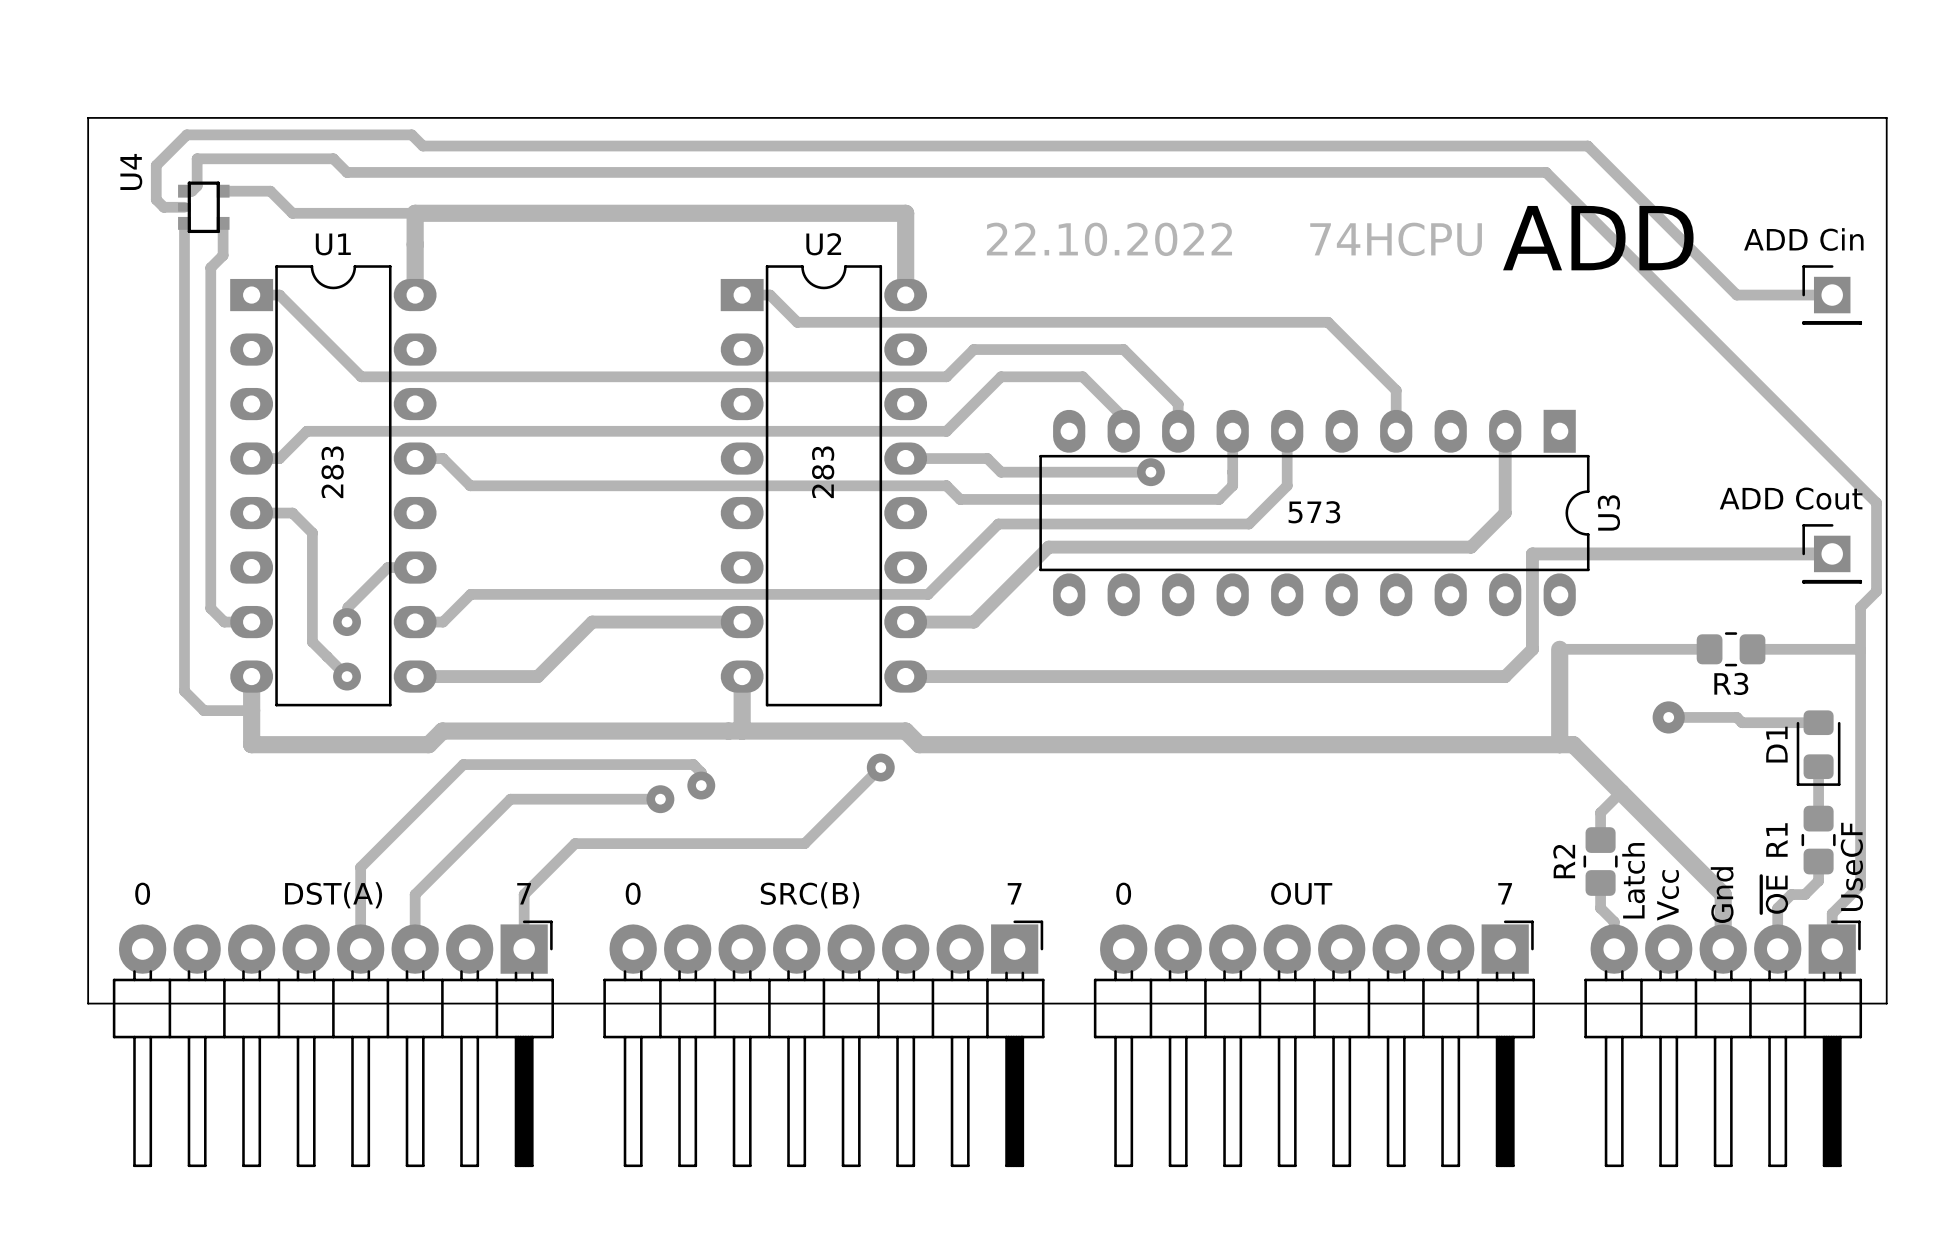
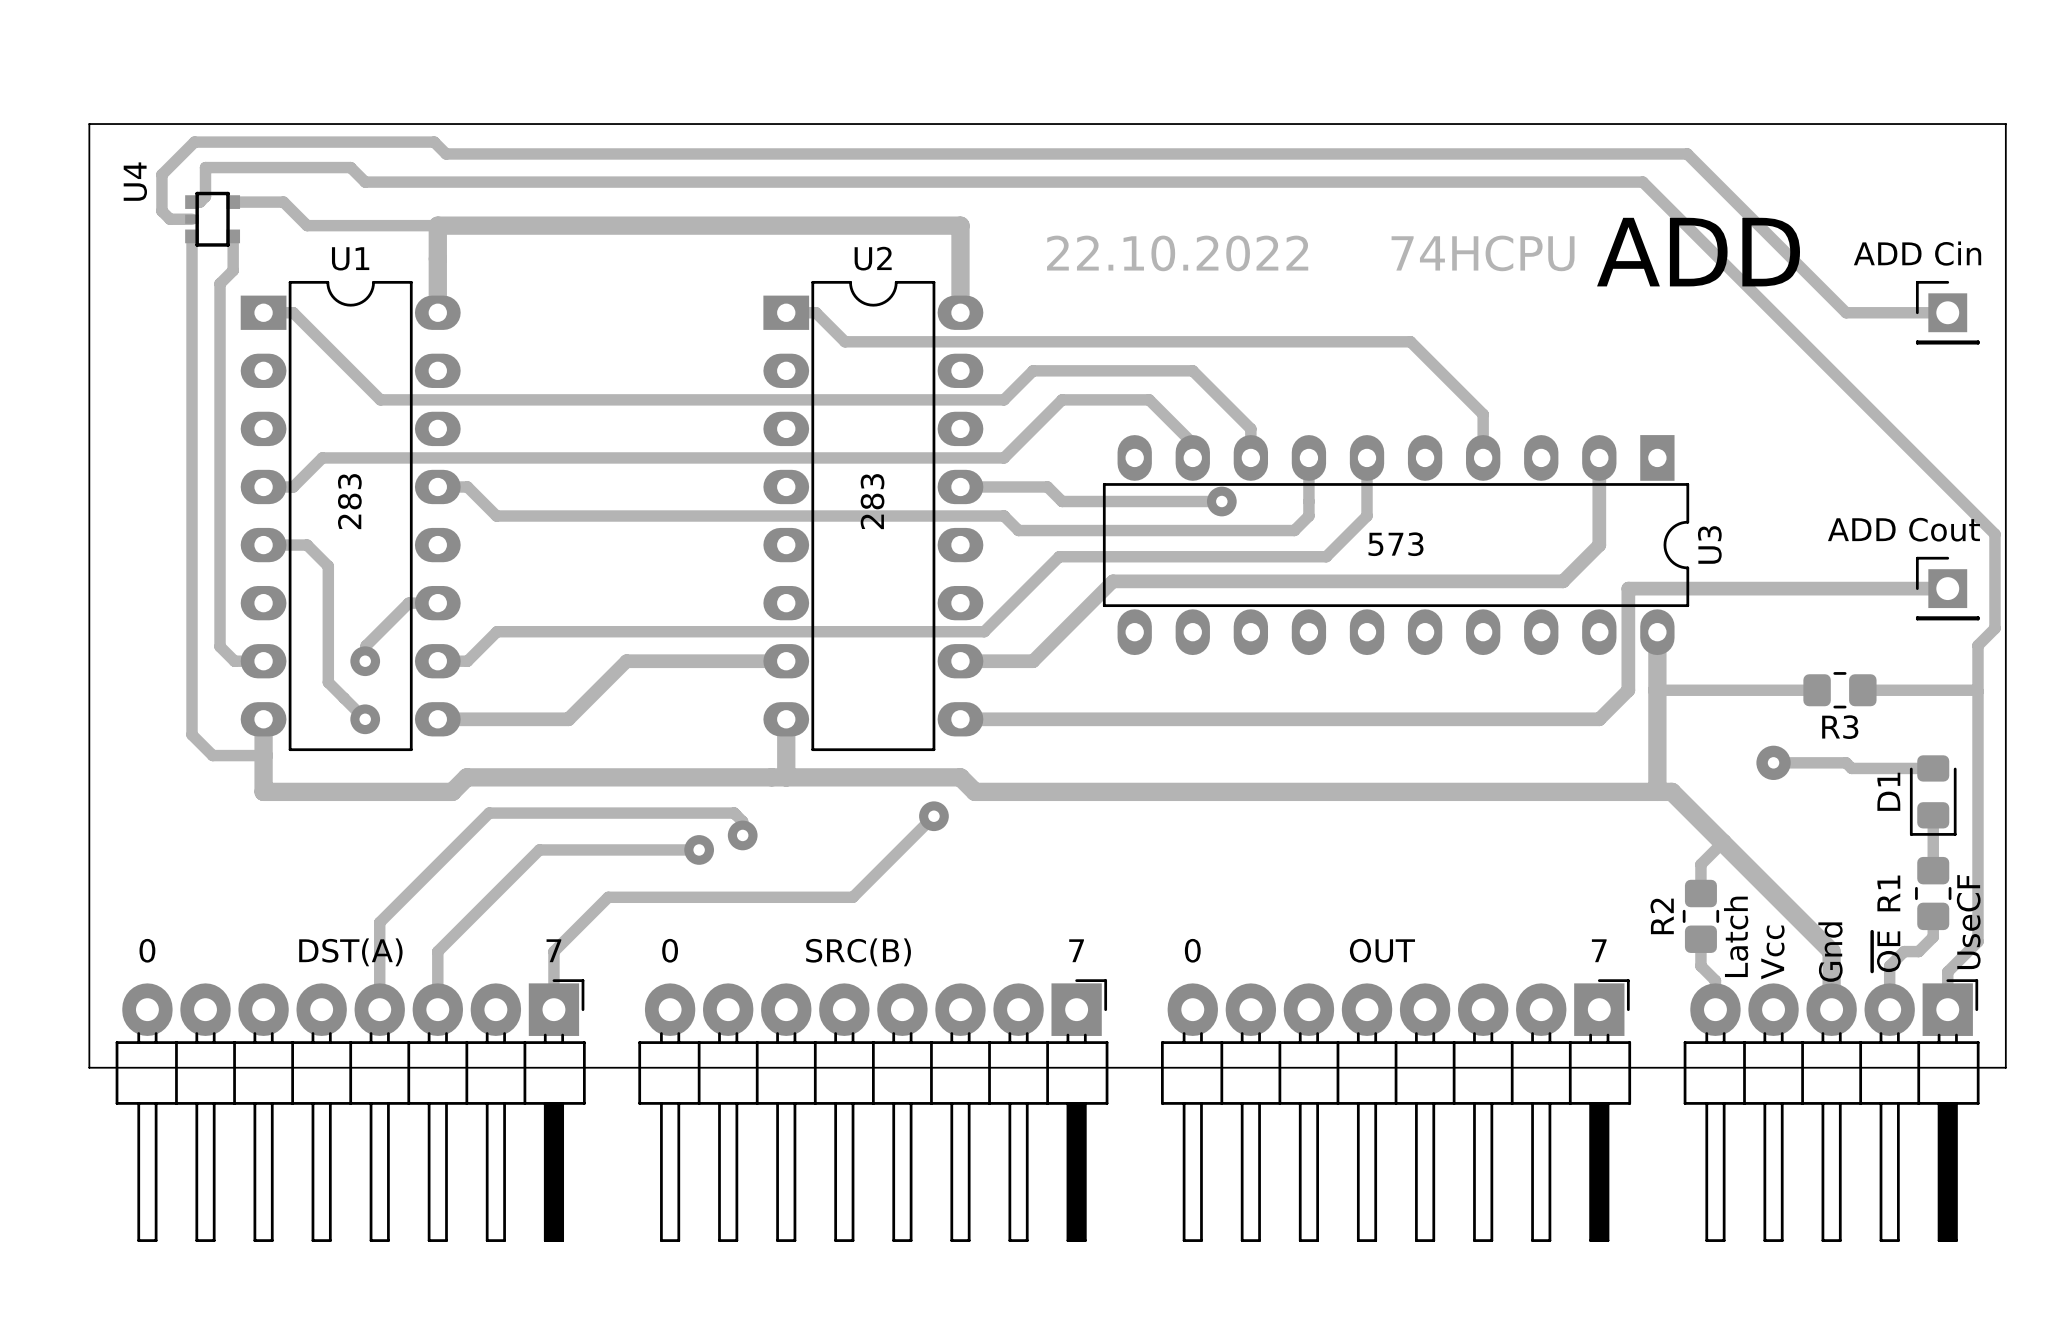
track: none -> (1657, 632) (1657, 690)

